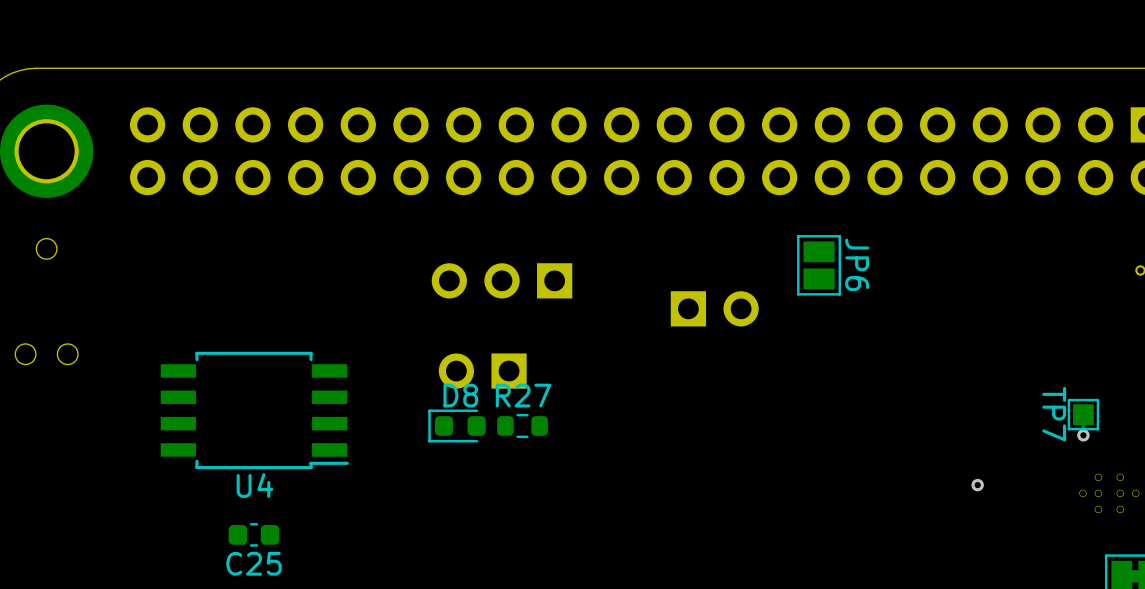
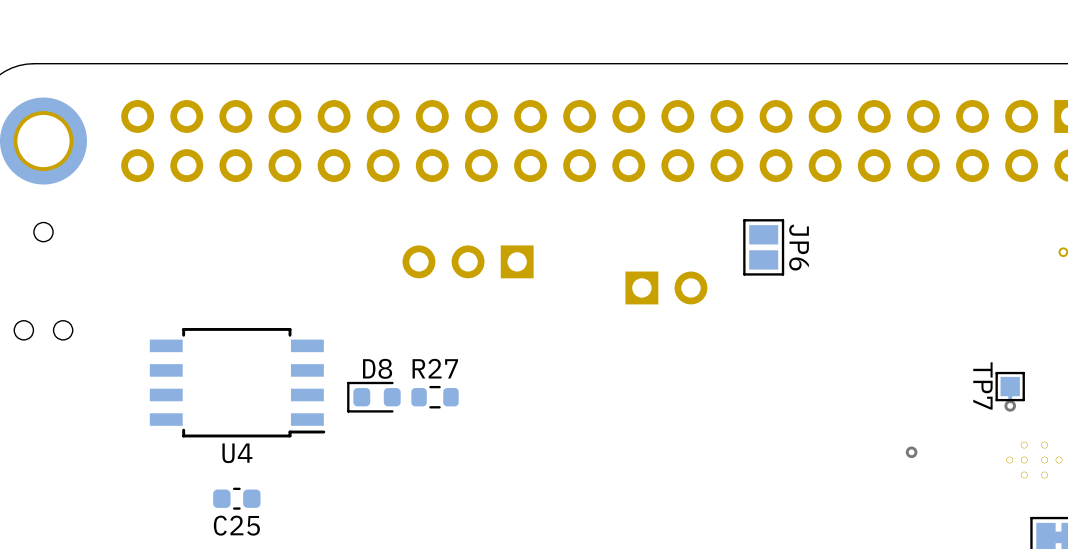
part: (482, 371) -> none
D8 position: (457, 425) -> (373, 397)
R27 position: (522, 425) -> (435, 397)

